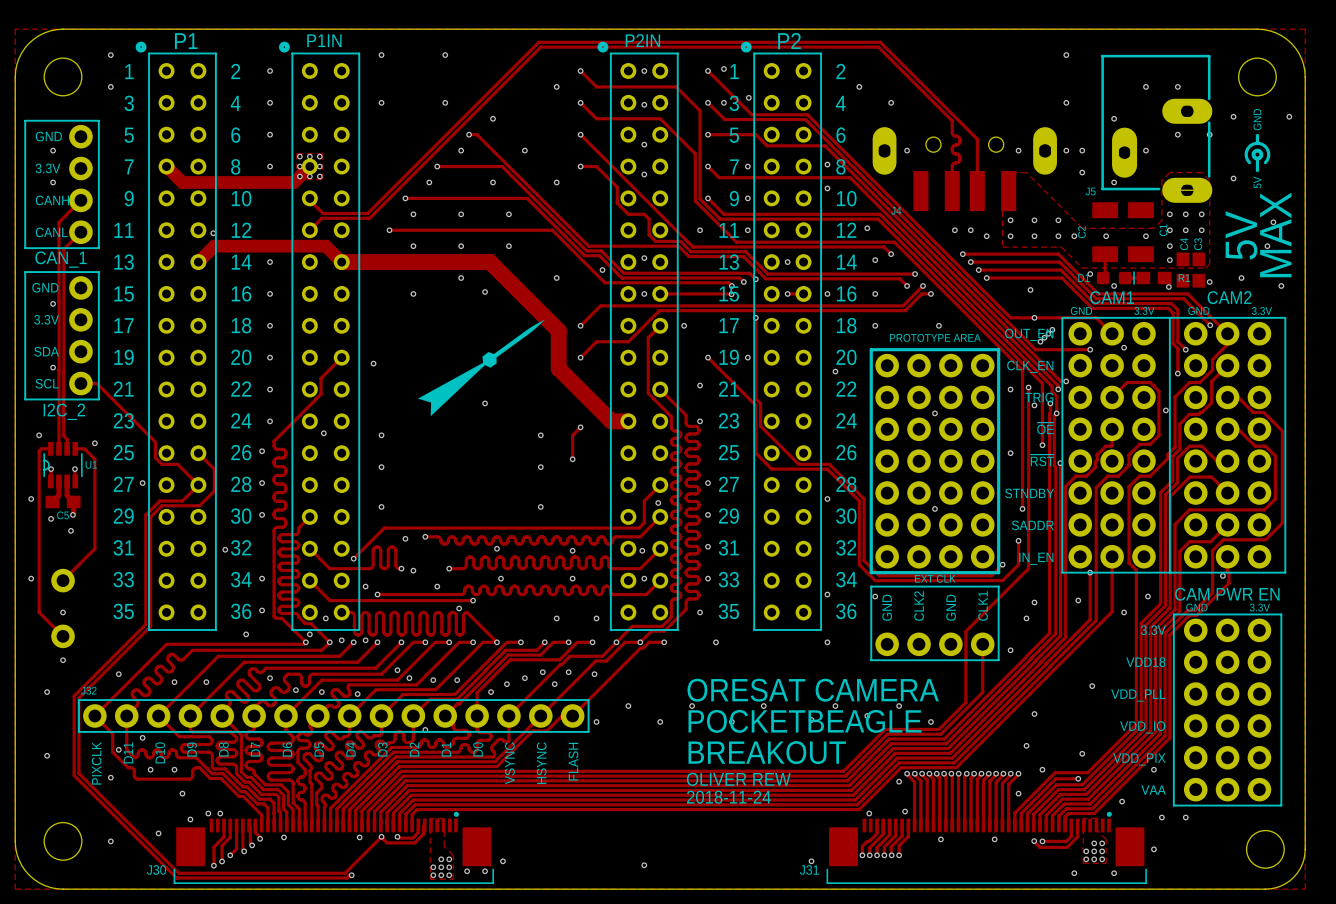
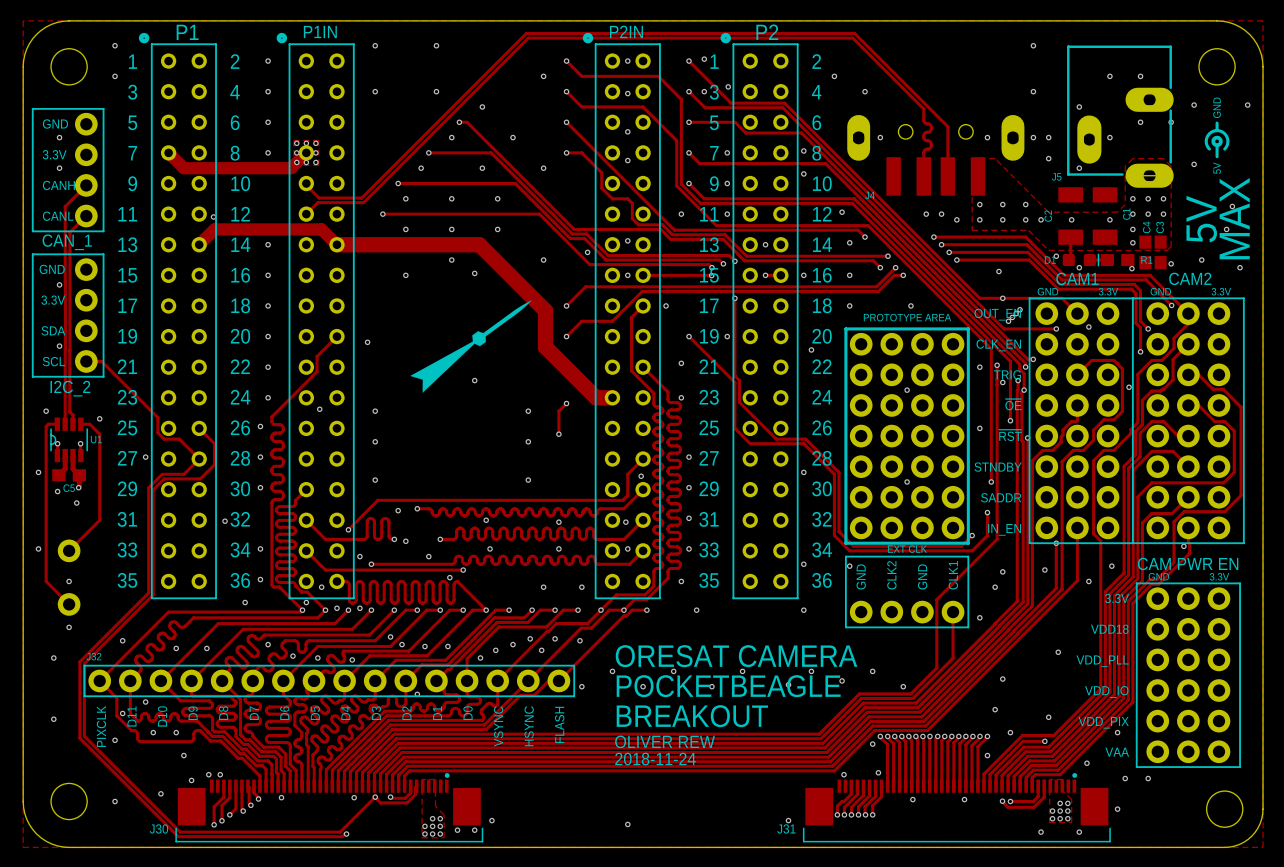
text position: ORESAT CAMERA (813, 690) -> ORESAT CAMERA (736, 656)
text position: POCKETBEAGLE (805, 721) -> POCKETBEAGLE (728, 686)
text position: BREAKOUT (767, 752) -> BREAKOUT (692, 716)
text position: OLIVER REW (738, 779) -> OLIVER REW (665, 741)
text position: 2018-11-24 (728, 797) -> 2018-11-24 (655, 759)

